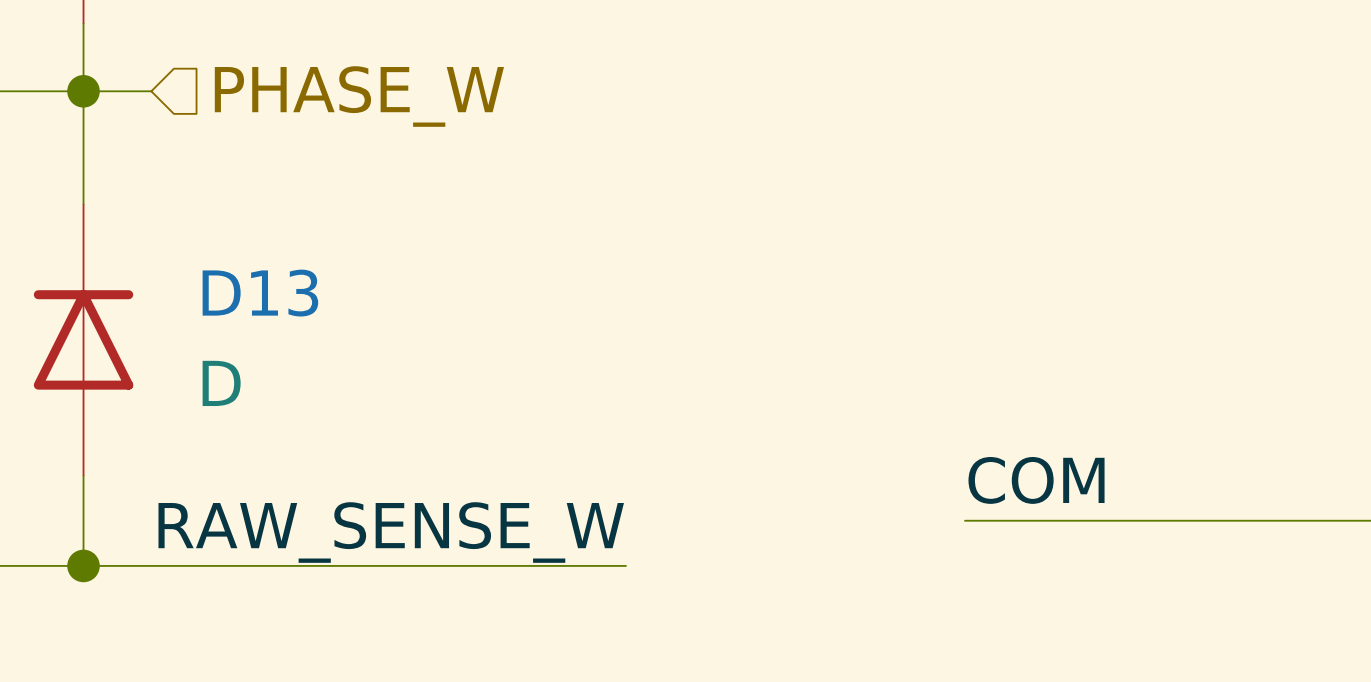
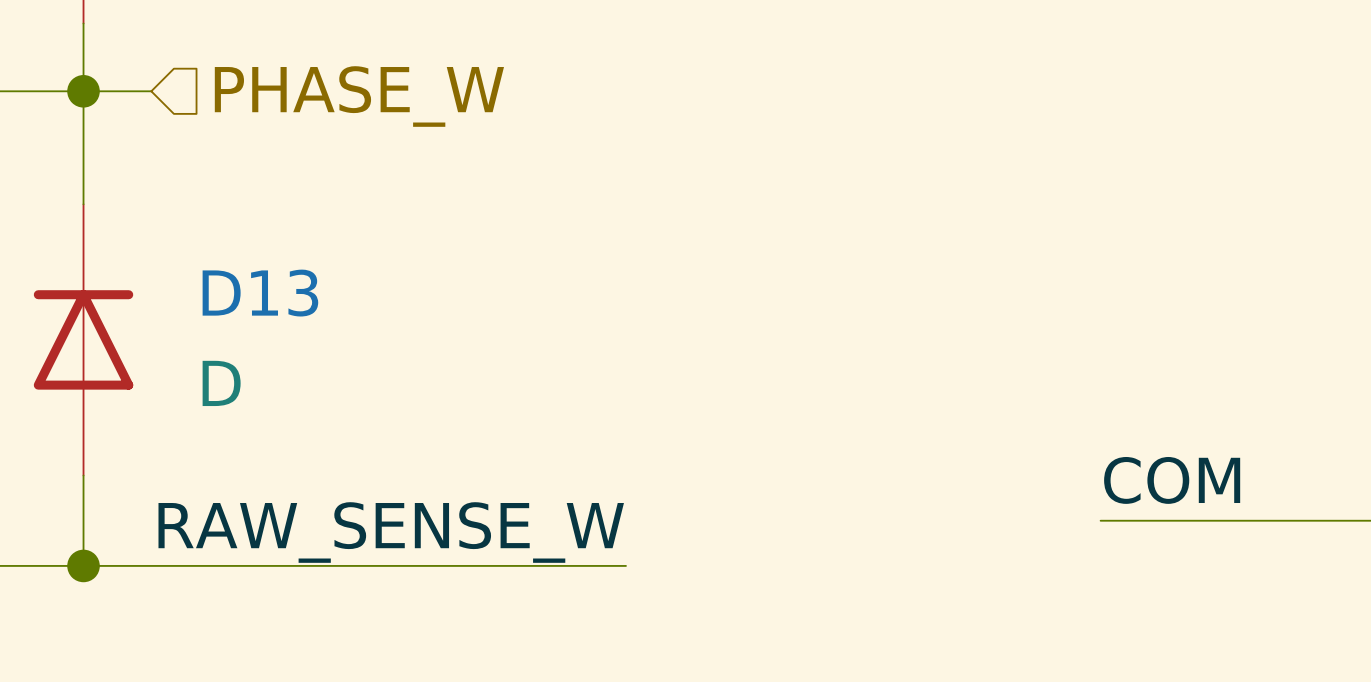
label position: COM (1036, 480) -> COM (1172, 480)
wire: (965, 520) (1100, 520) -> none

